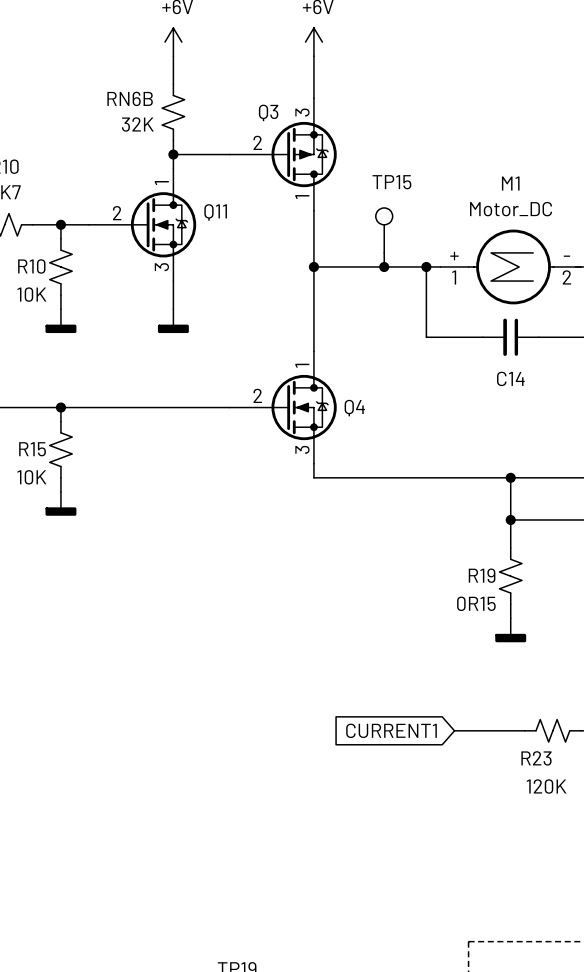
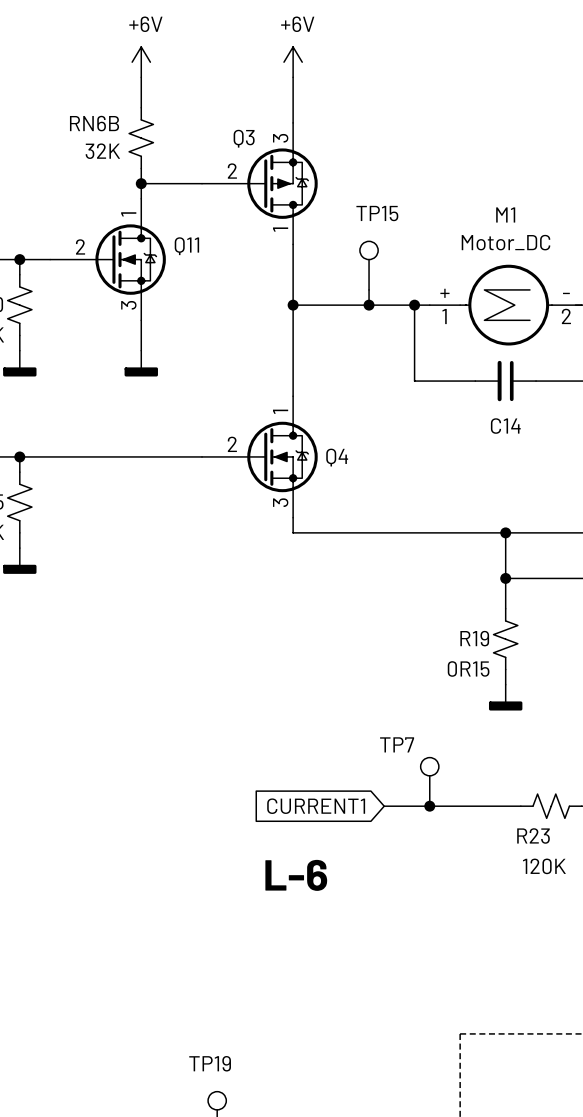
TP7: none -> (429, 781)
global label position: CURRENT1 (391, 730) -> CURRENT1 (316, 806)
wire: none -> (384, 806) (444, 806)
junction: none -> (429, 806)
text: none -> L-6 (296, 875)

